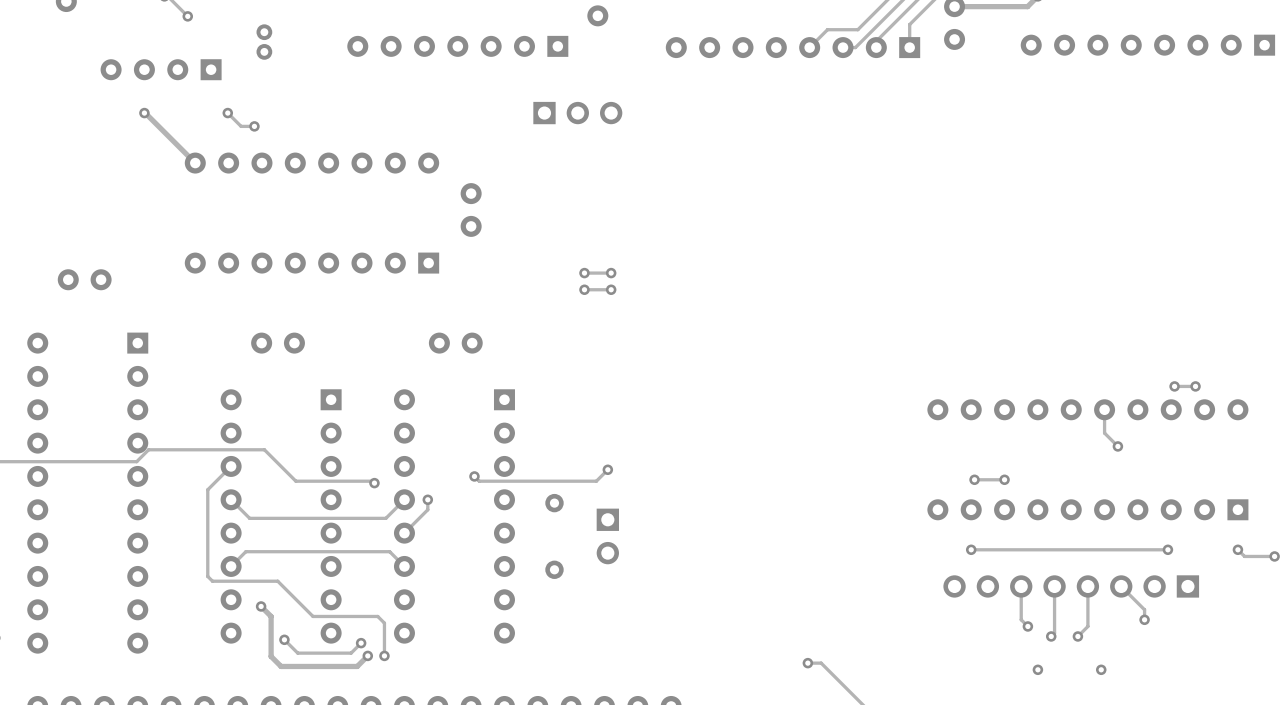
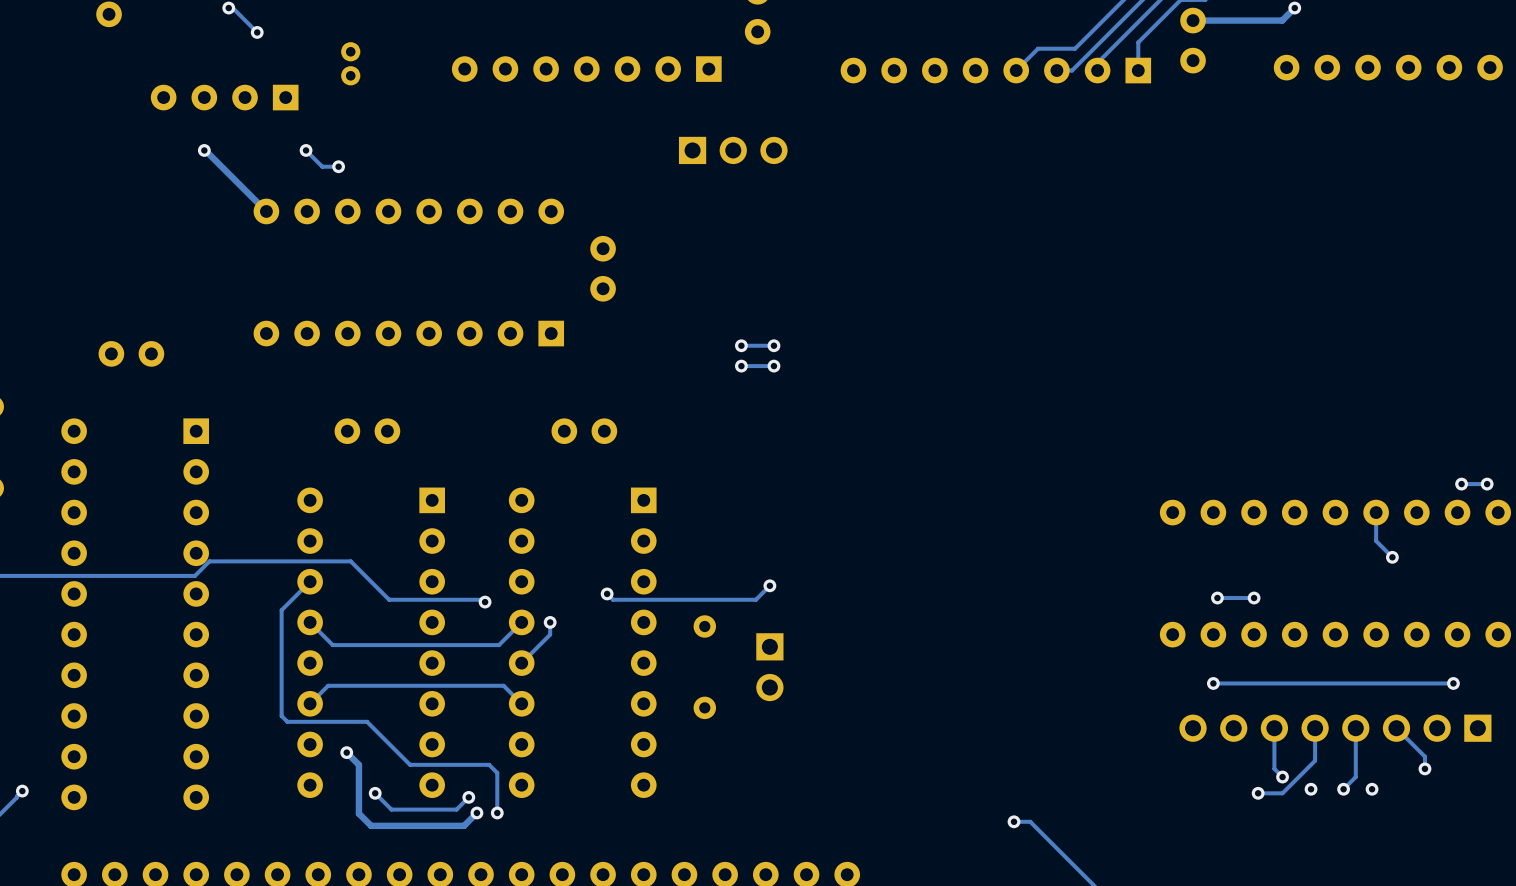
track: (1054, 613) (1054, 633) (1051, 636) -> (1315, 760) (1282, 793) (1258, 793)
via: none -> (1258, 793)
via: (1037, 669) -> none
via position: (1101, 669) -> (1372, 789)

